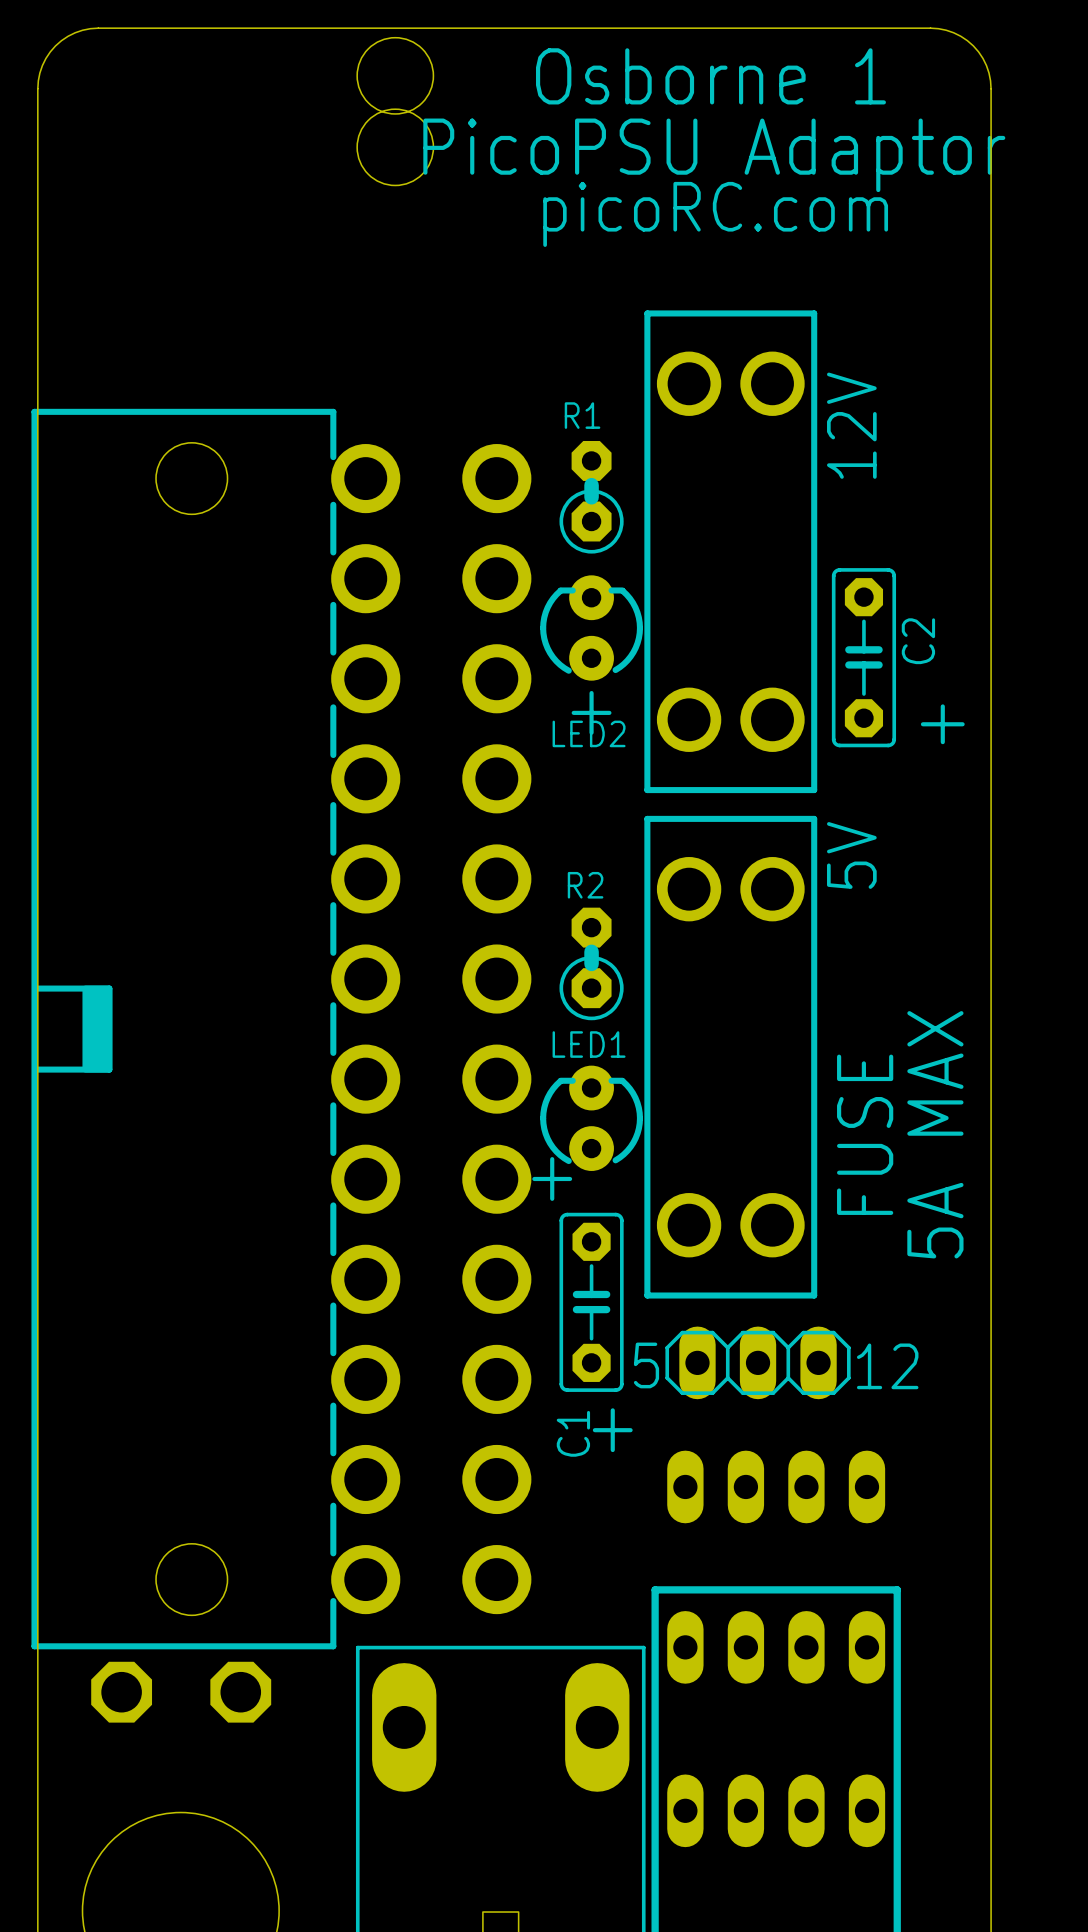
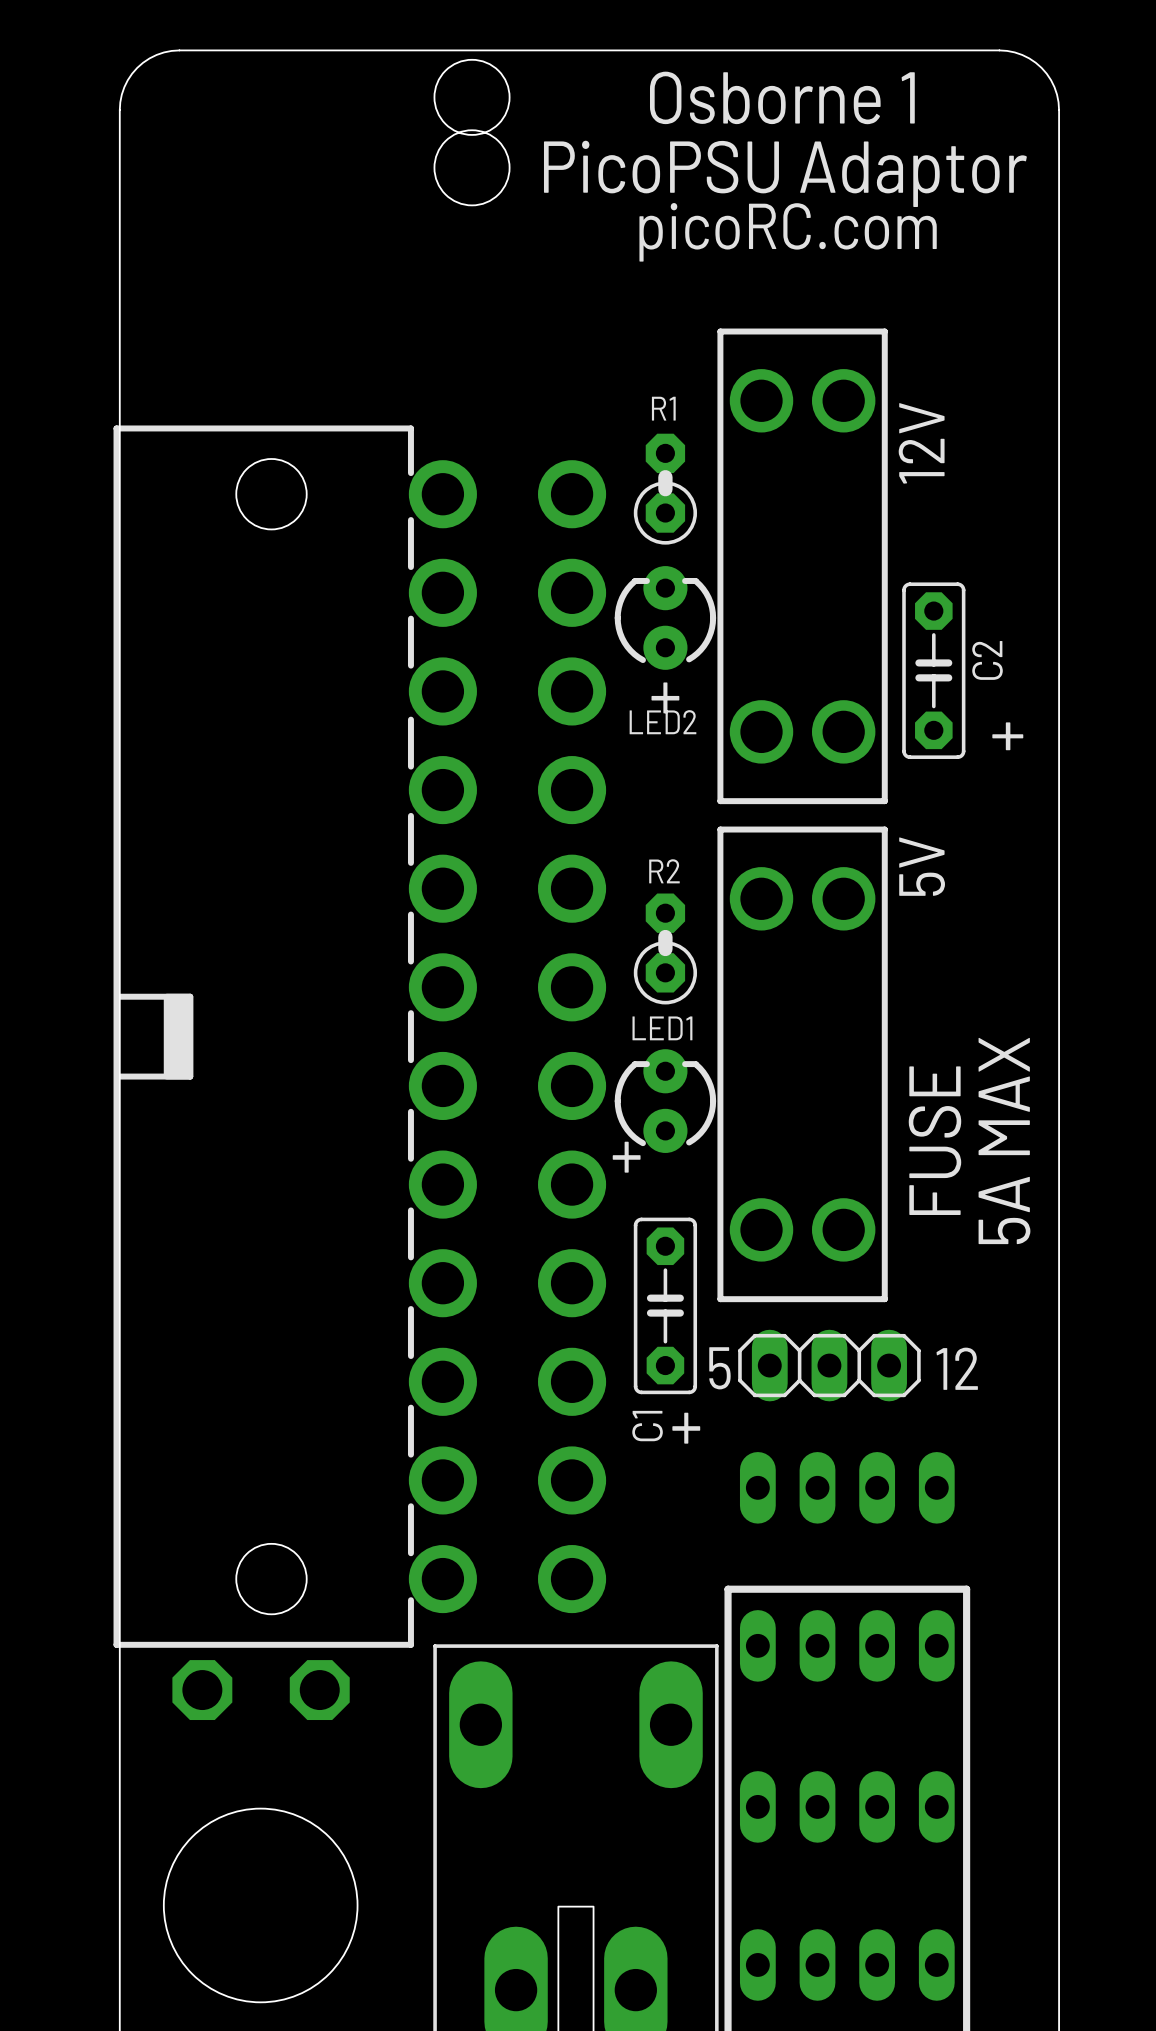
R1 position: (591, 497) -> (665, 489)
LED2 position: (591, 628) -> (665, 617)
text position: + (591, 712) -> + (665, 697)
R2 position: (591, 963) -> (665, 948)
LED1 position: (591, 1118) -> (665, 1101)
text position: + (552, 1178) -> + (626, 1157)

